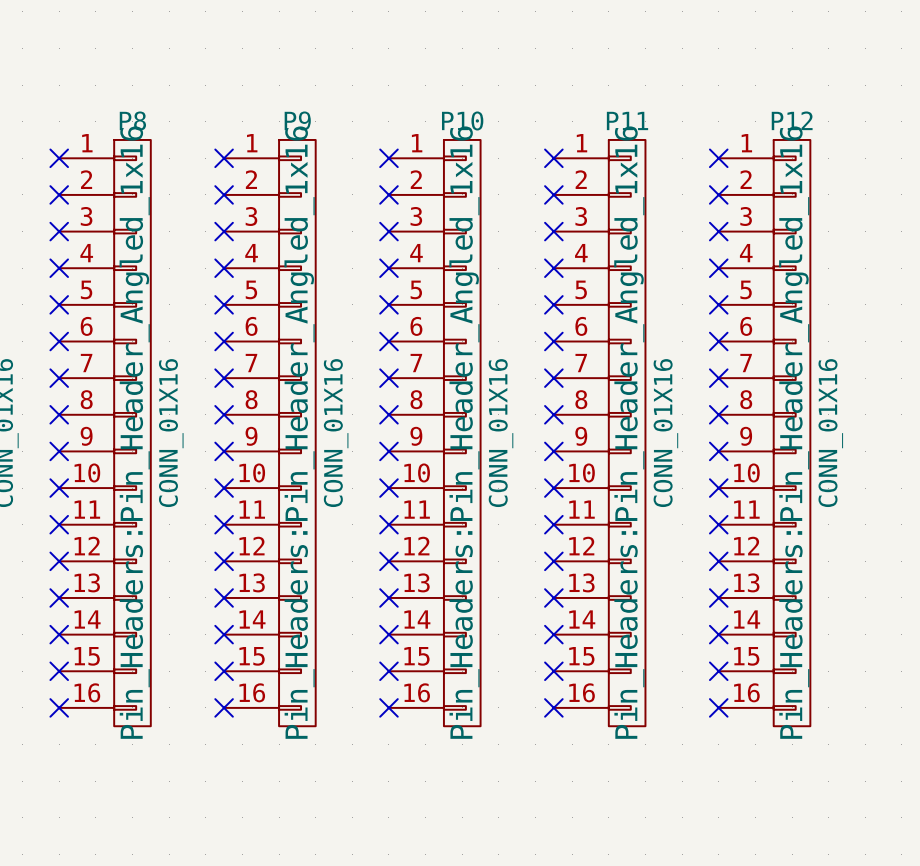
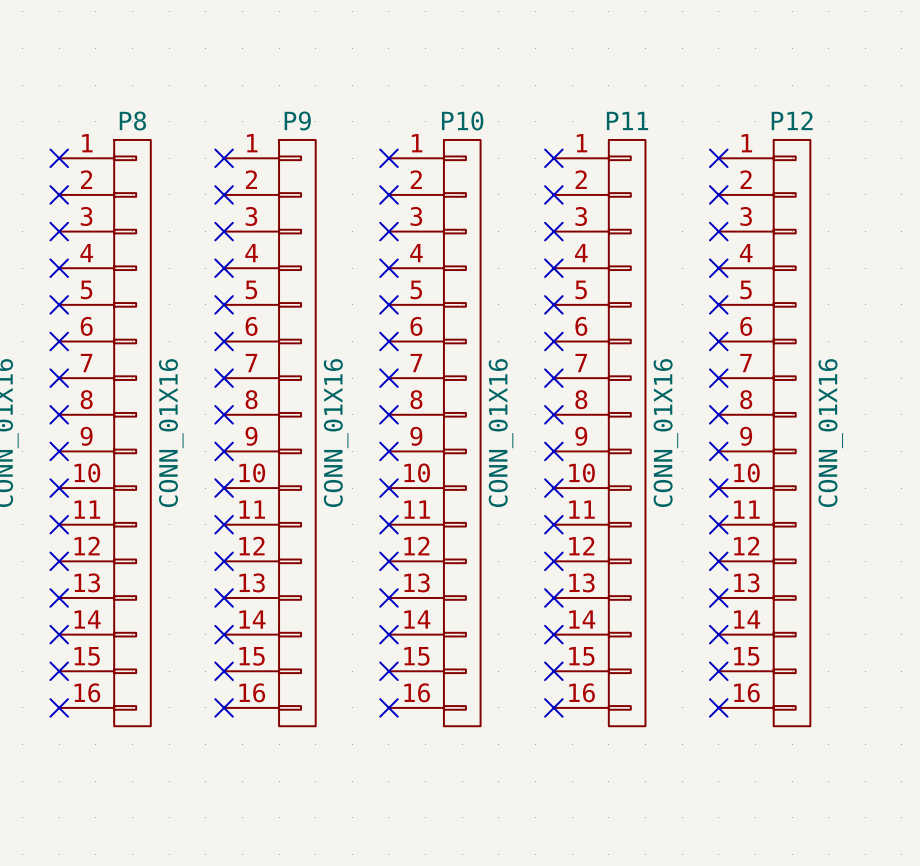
P8 text: Pin_Headers:Pin_Header_Angled_1x16 (134, 432) -> none
P9 text: Pin_Headers:Pin_Header_Angled_1x16 (299, 432) -> none
P10 text: Pin_Headers:Pin_Header_Angled_1x16 (464, 432) -> none
P11 text: Pin_Headers:Pin_Header_Angled_1x16 (629, 432) -> none
P12 text: Pin_Headers:Pin_Header_Angled_1x16 (794, 432) -> none

